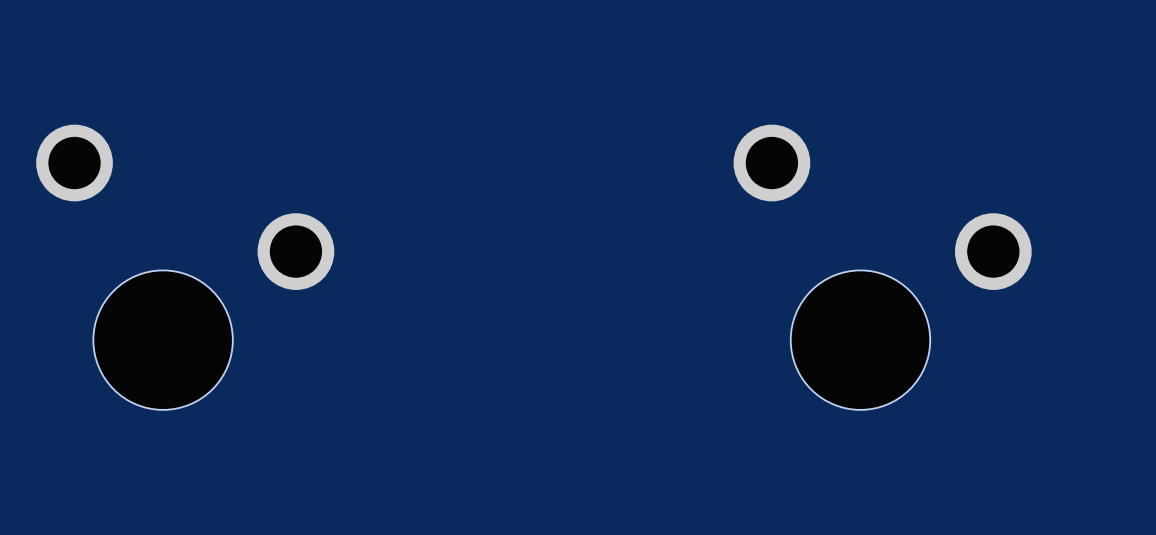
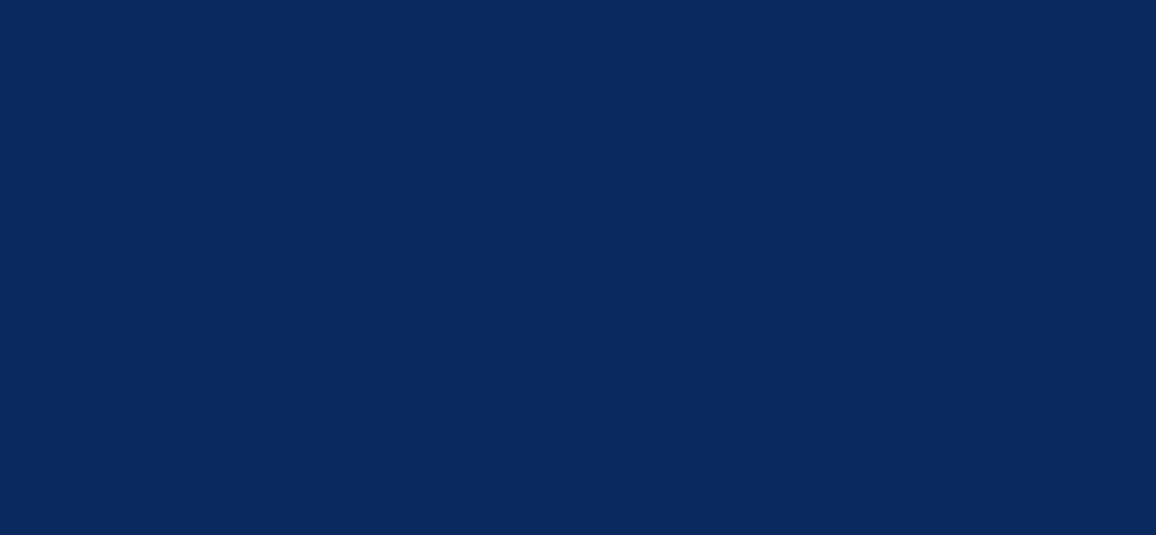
part: (185, 267) -> none
part: (882, 267) -> none

